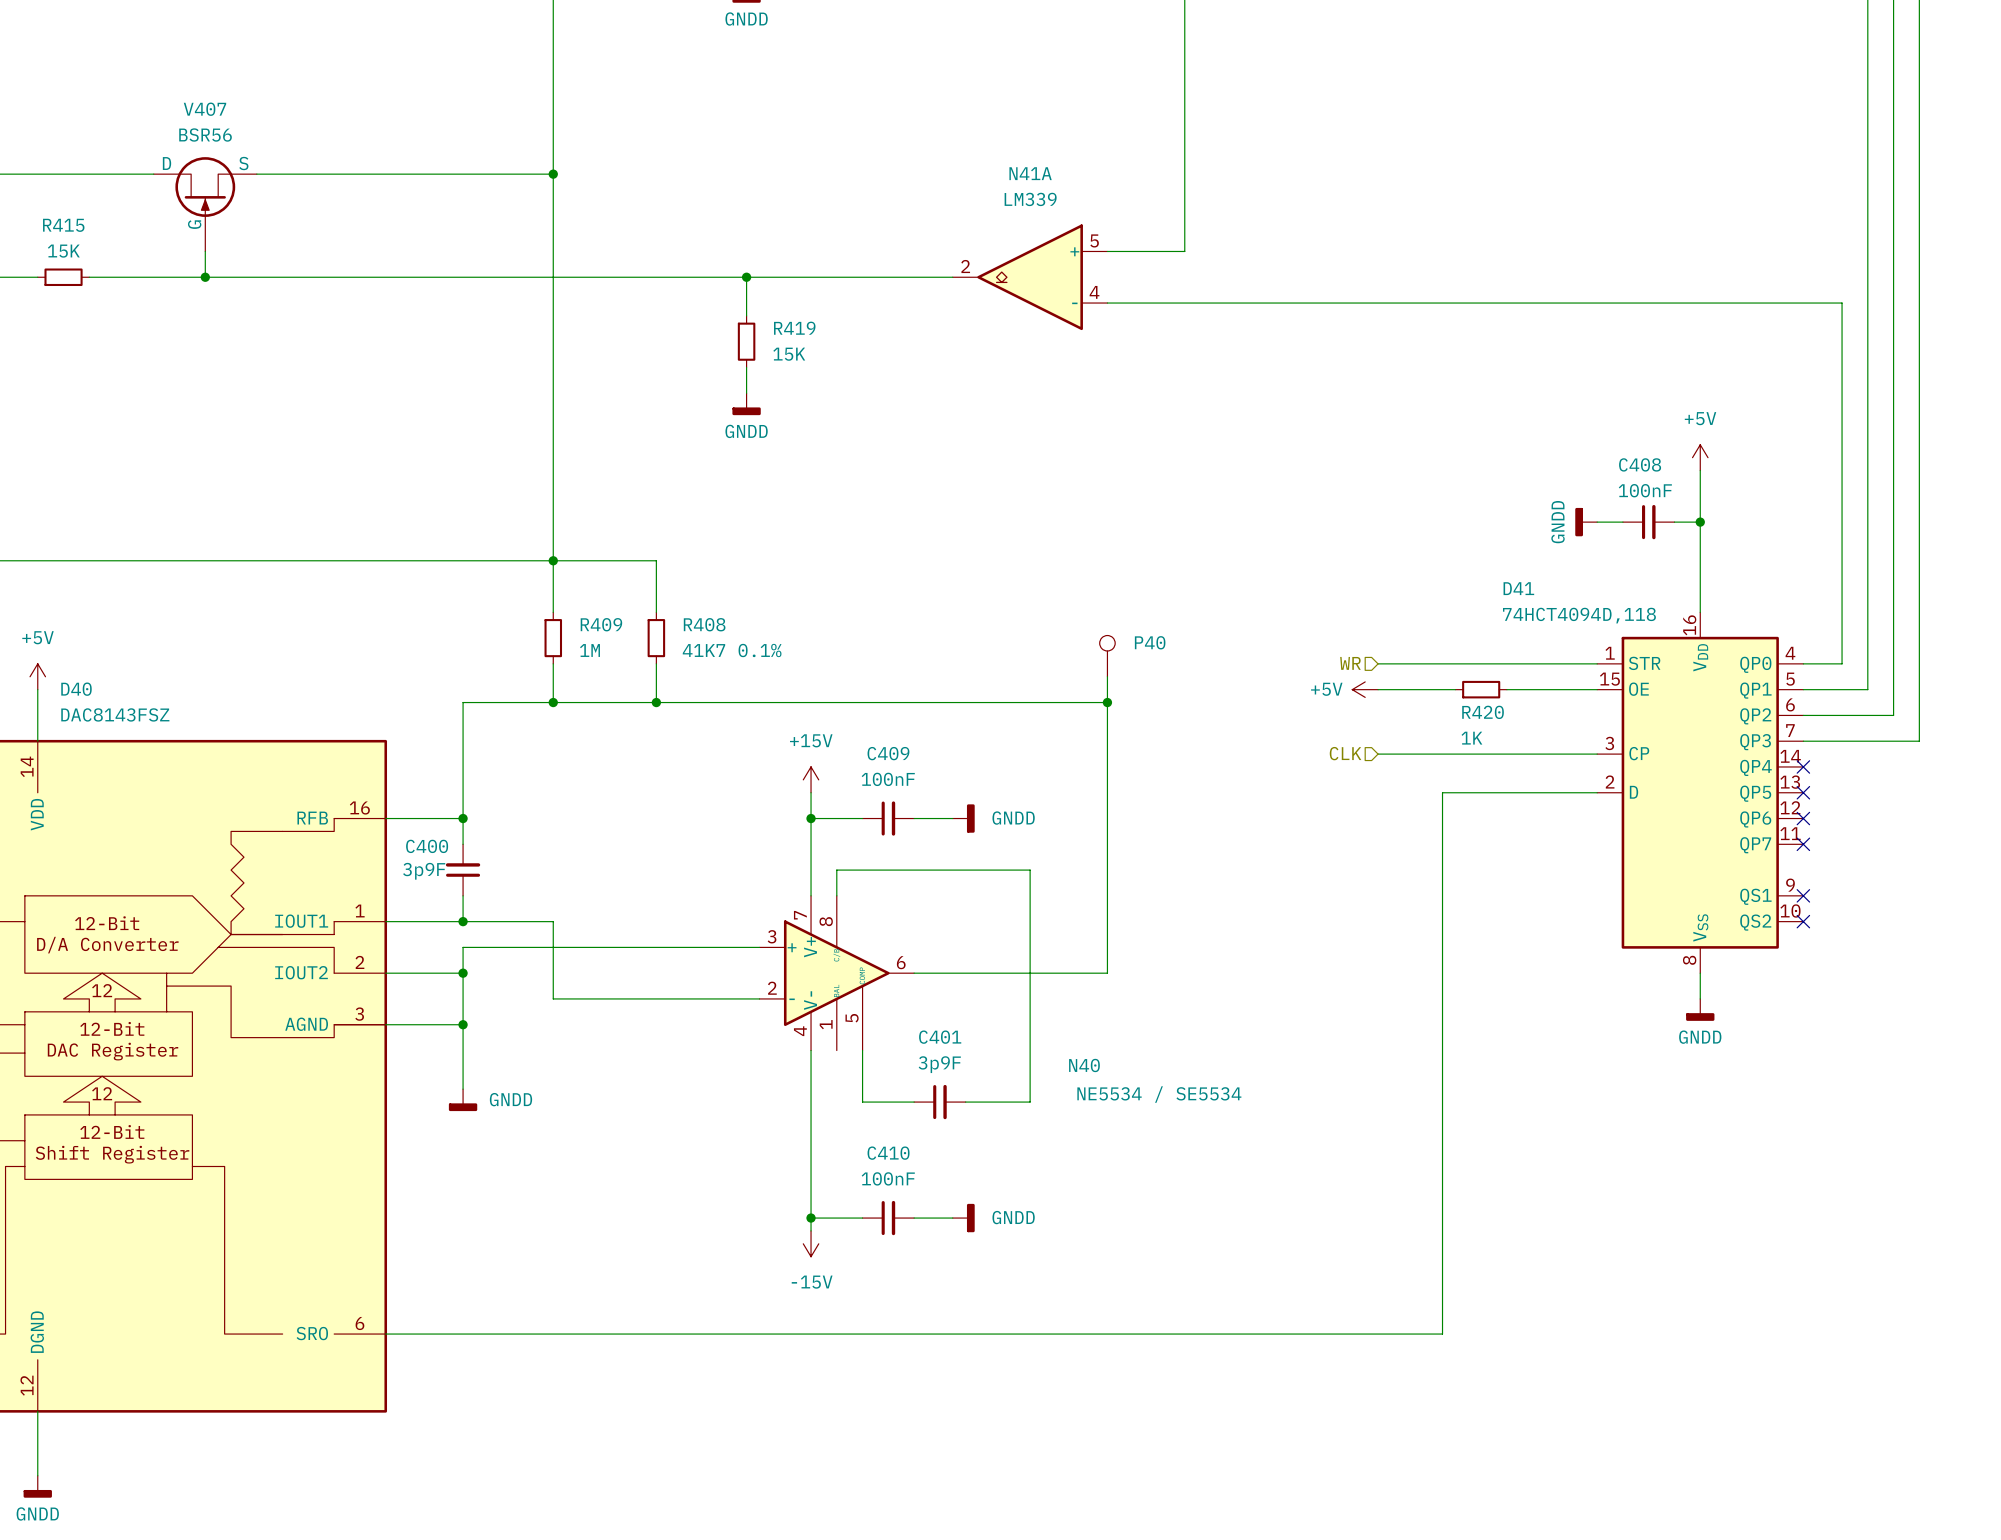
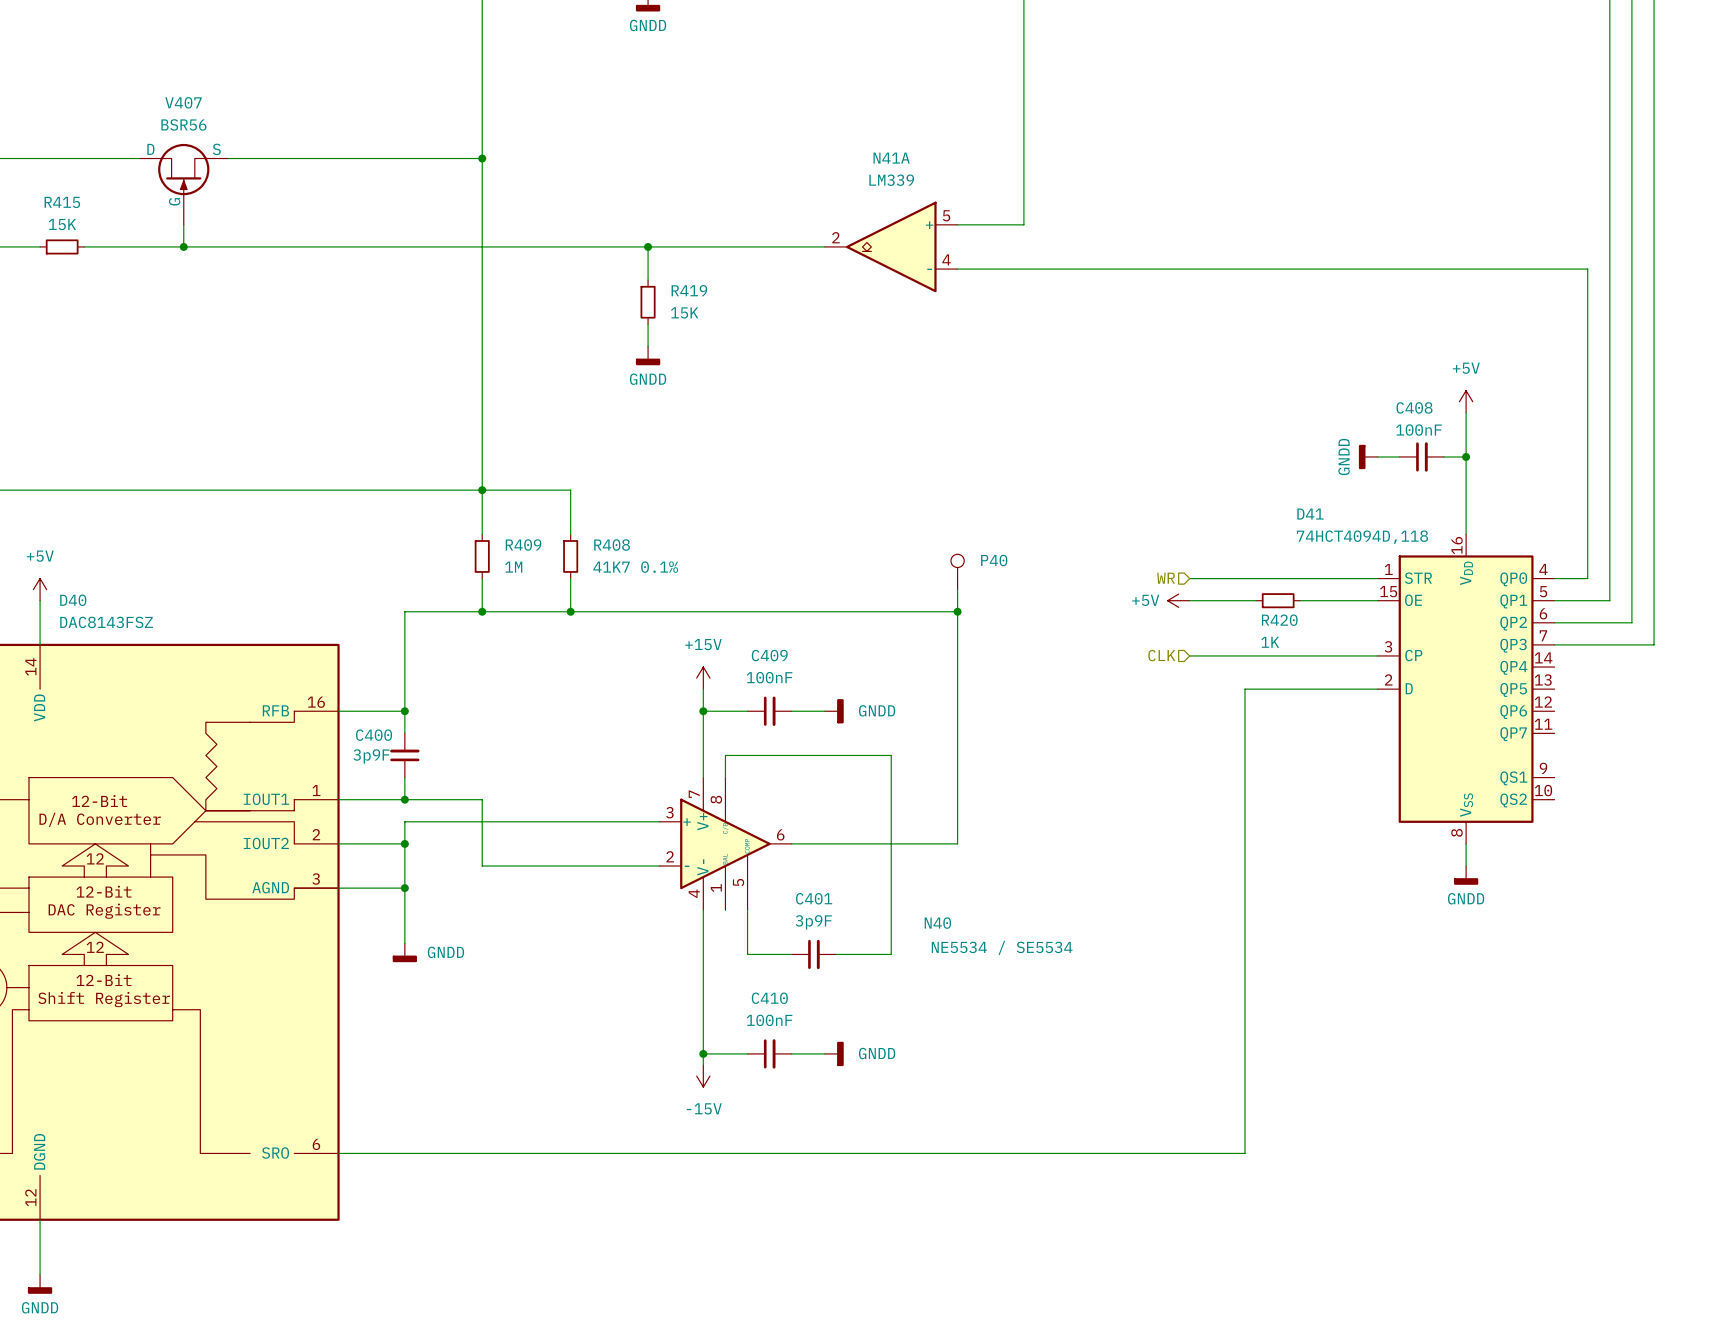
no-connect mark: (1803, 766) -> none
no-connect mark: (1803, 792) -> none
no-connect mark: (1803, 818) -> none
no-connect mark: (1803, 844) -> none
no-connect mark: (1803, 895) -> none
no-connect mark: (1803, 921) -> none

